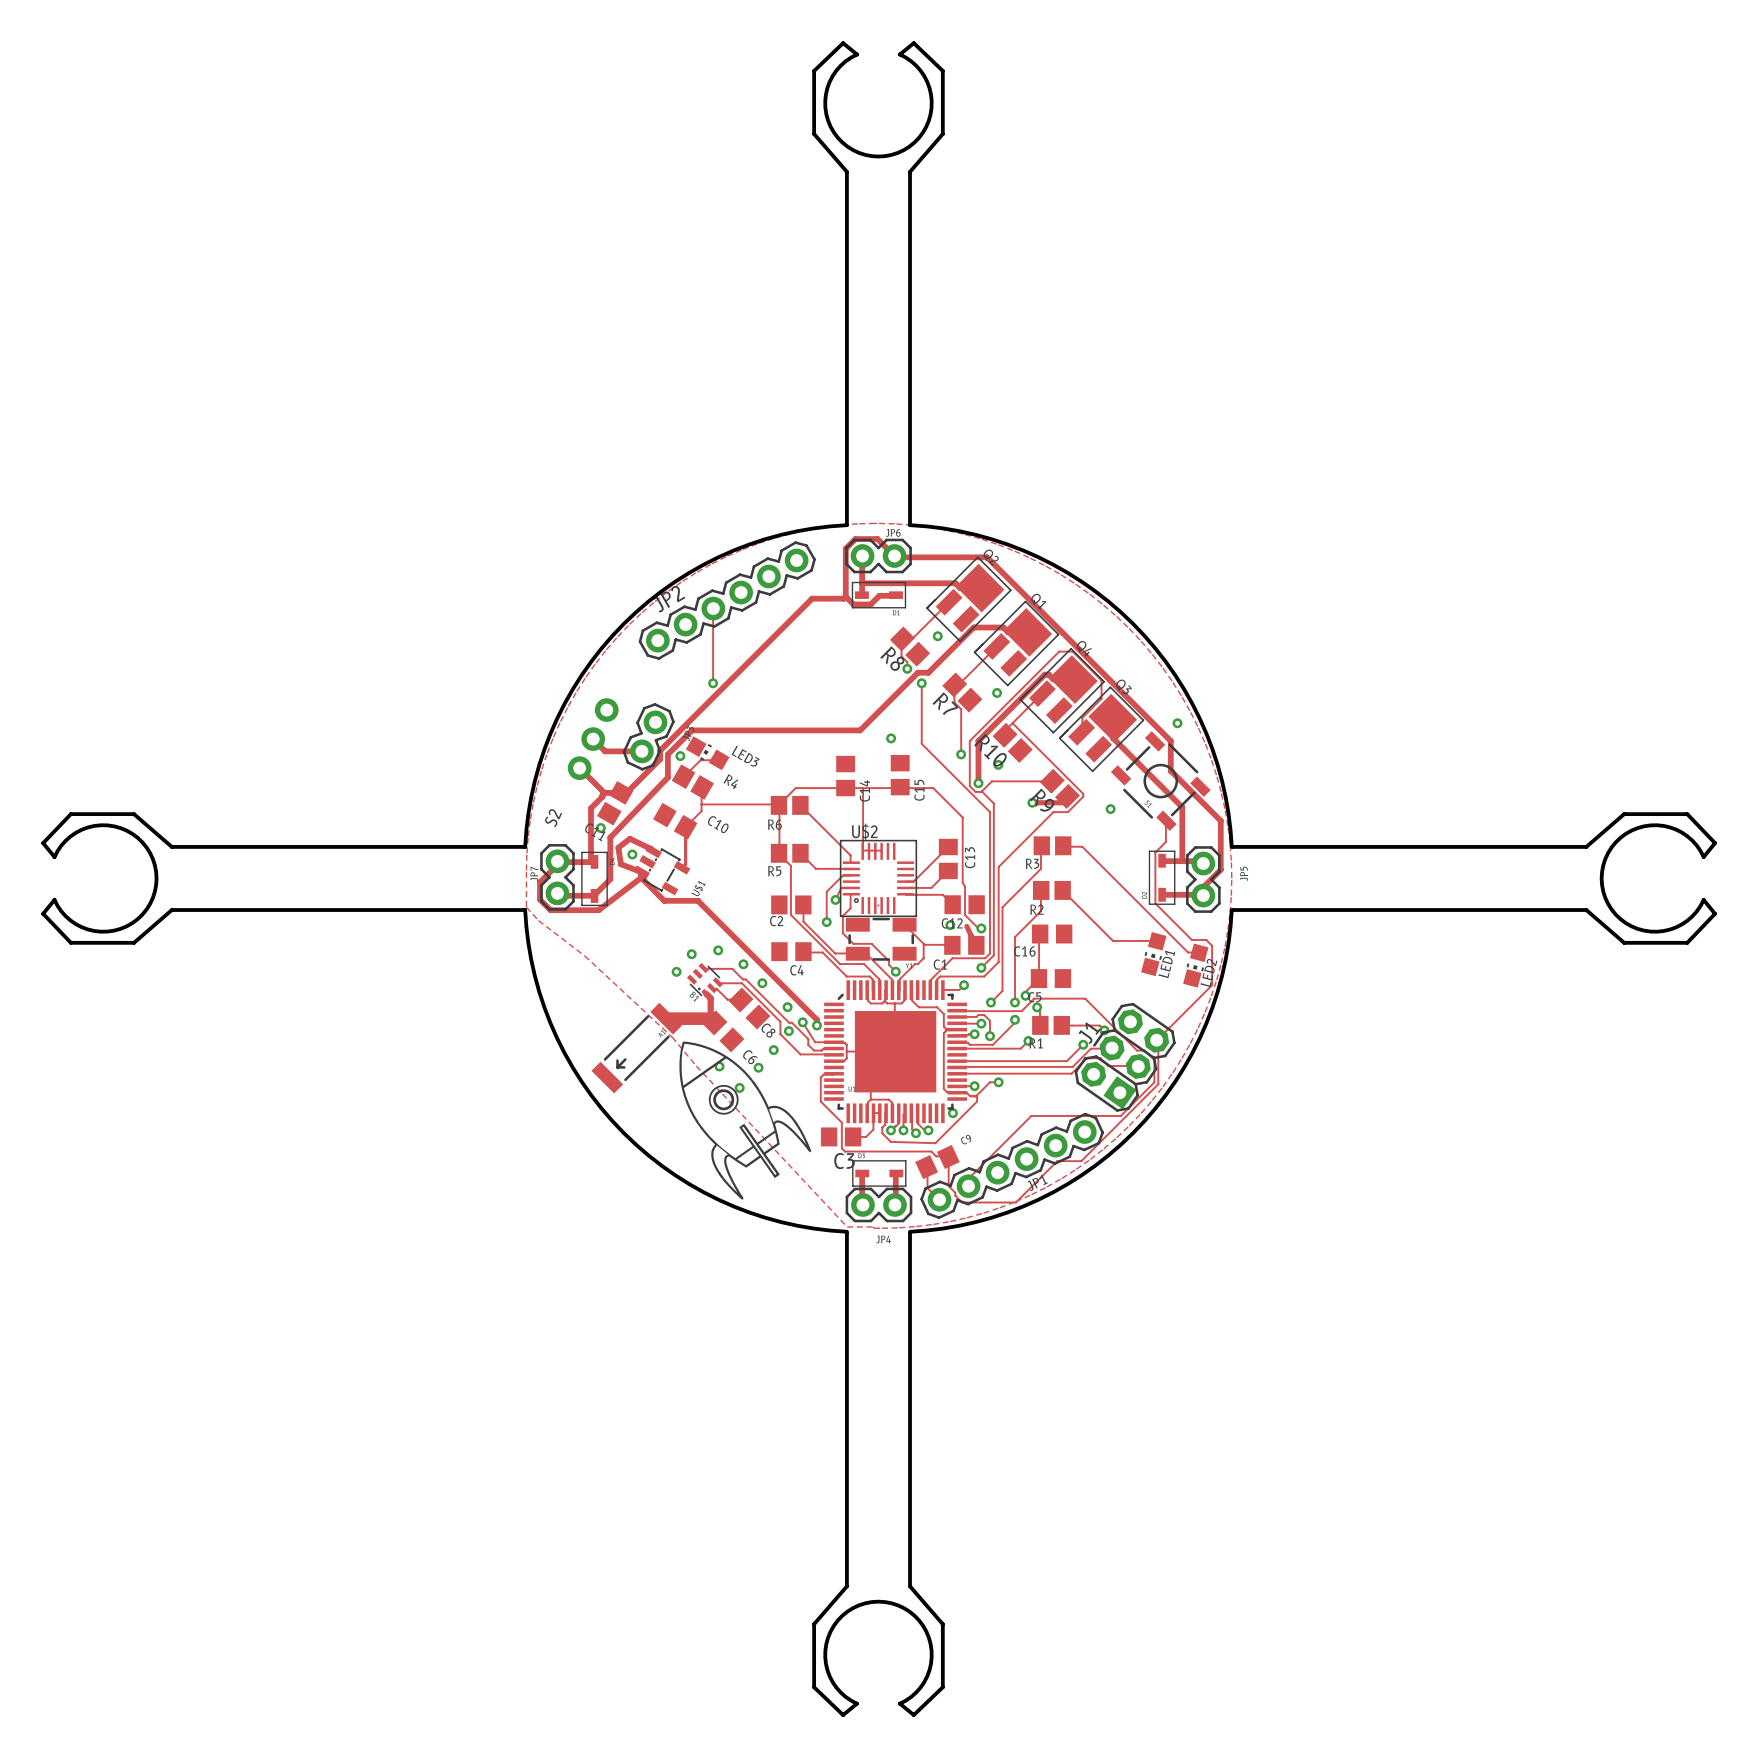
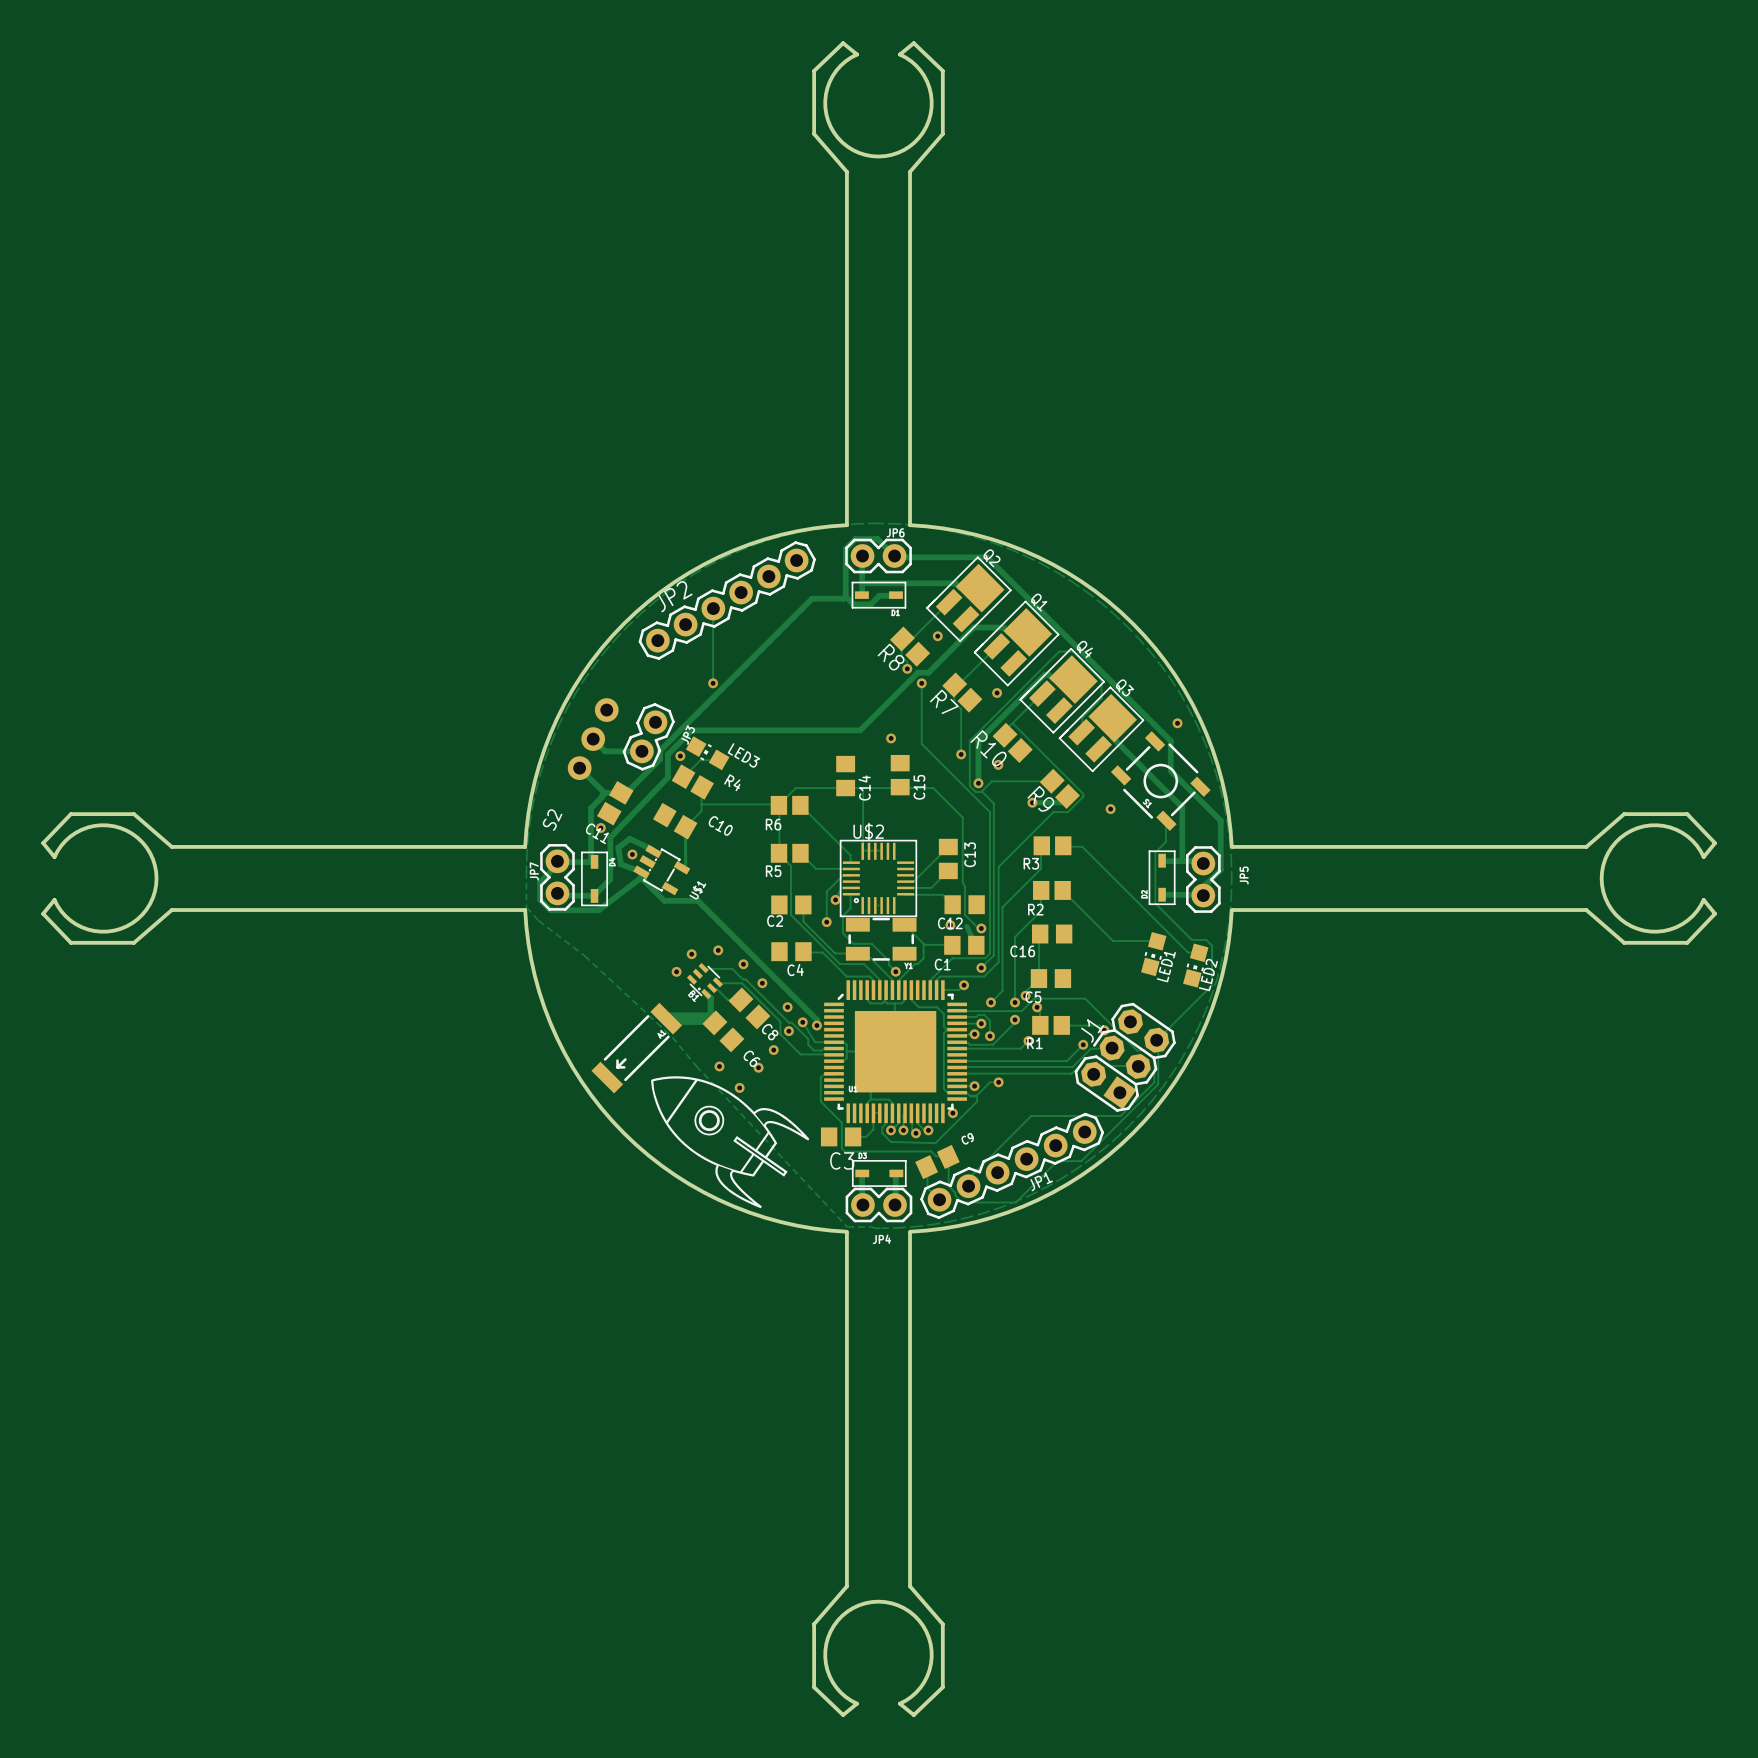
drawing: [679, 1041, 812, 1200] -> none
drawing: none -> [650, 1076, 810, 1209]

